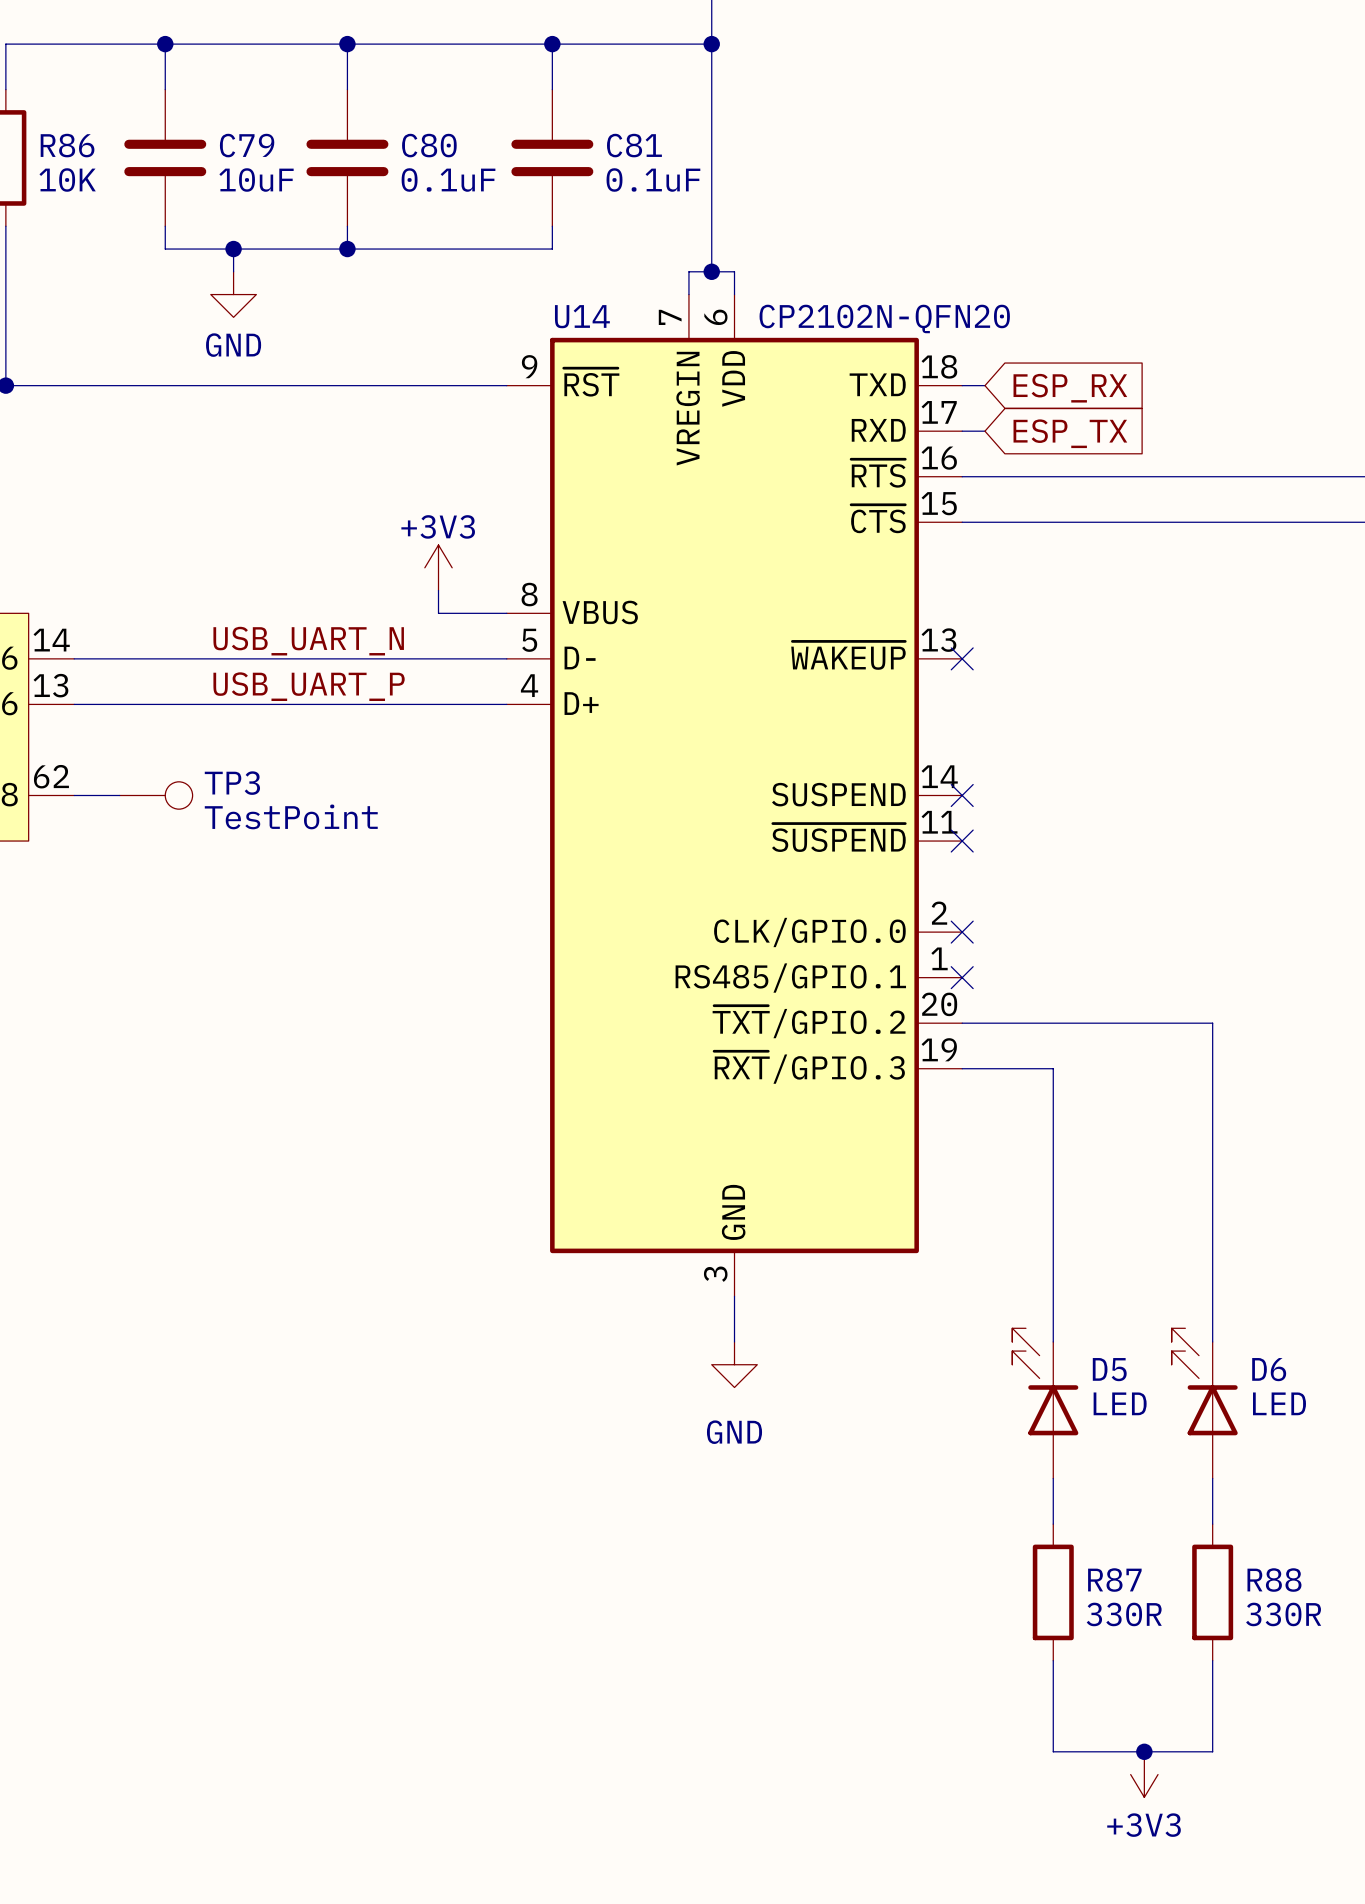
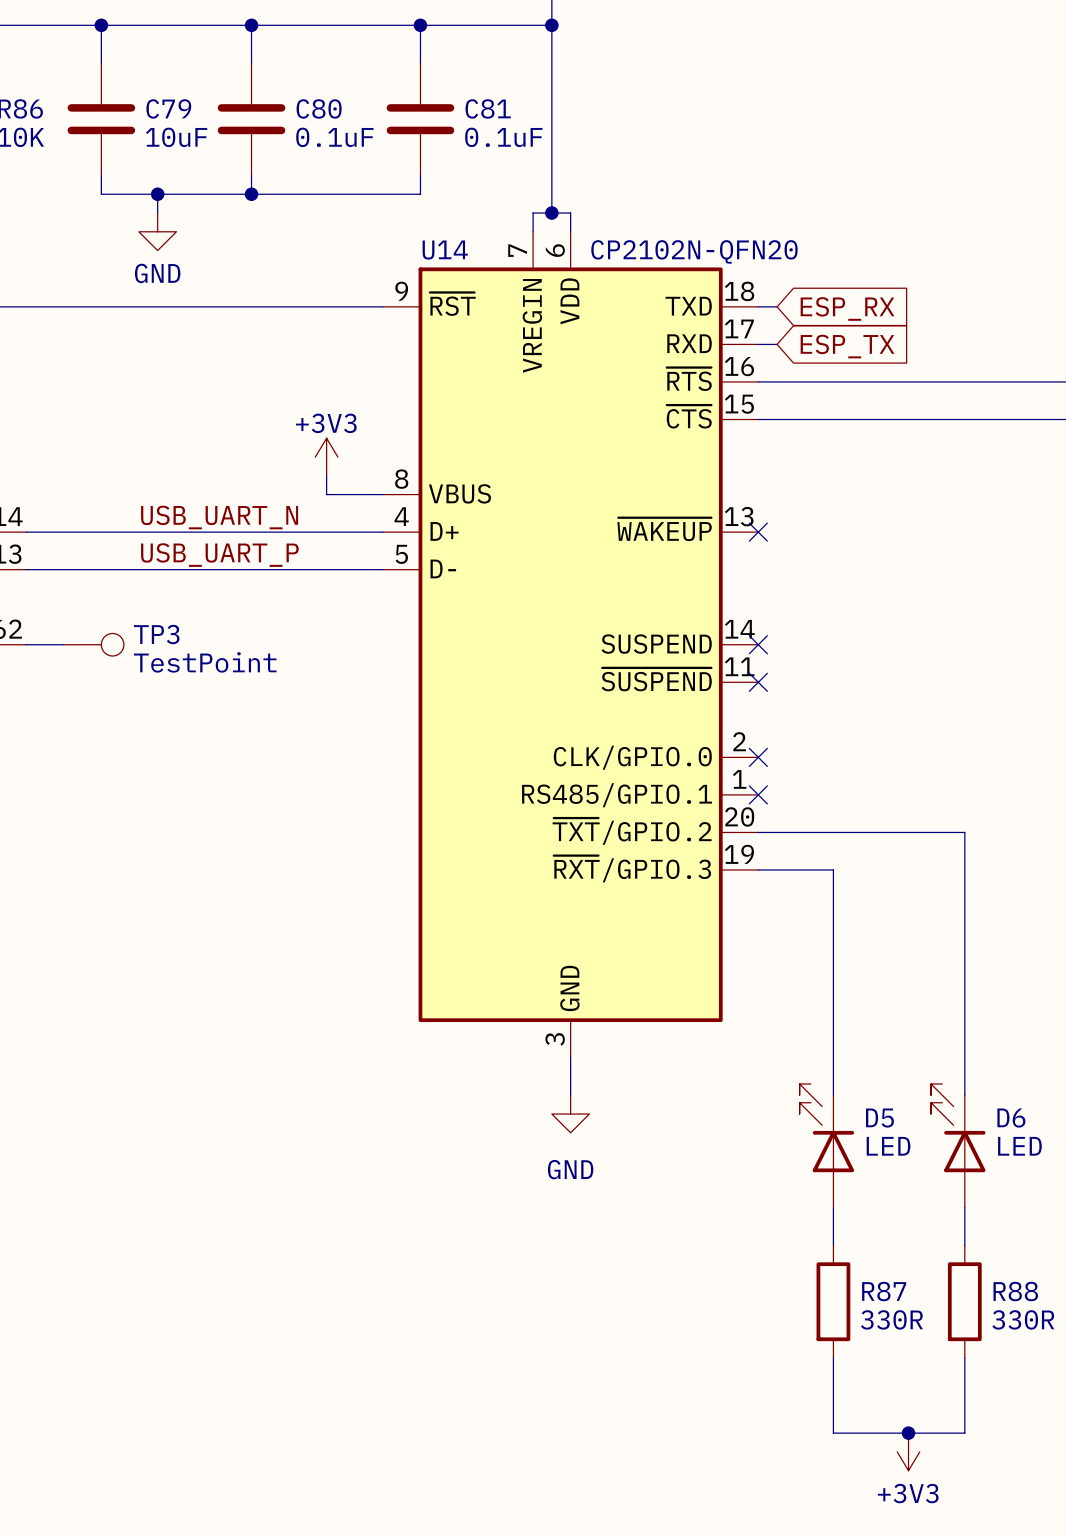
U14 pin number: 5 (529, 640) -> 4 (401, 516)
U14 pin name: D- (580, 658) -> D+ (444, 531)
U14 pin number: 4 (529, 685) -> 5 (401, 554)
U14 pin name: D+ (581, 703) -> D- (443, 568)

